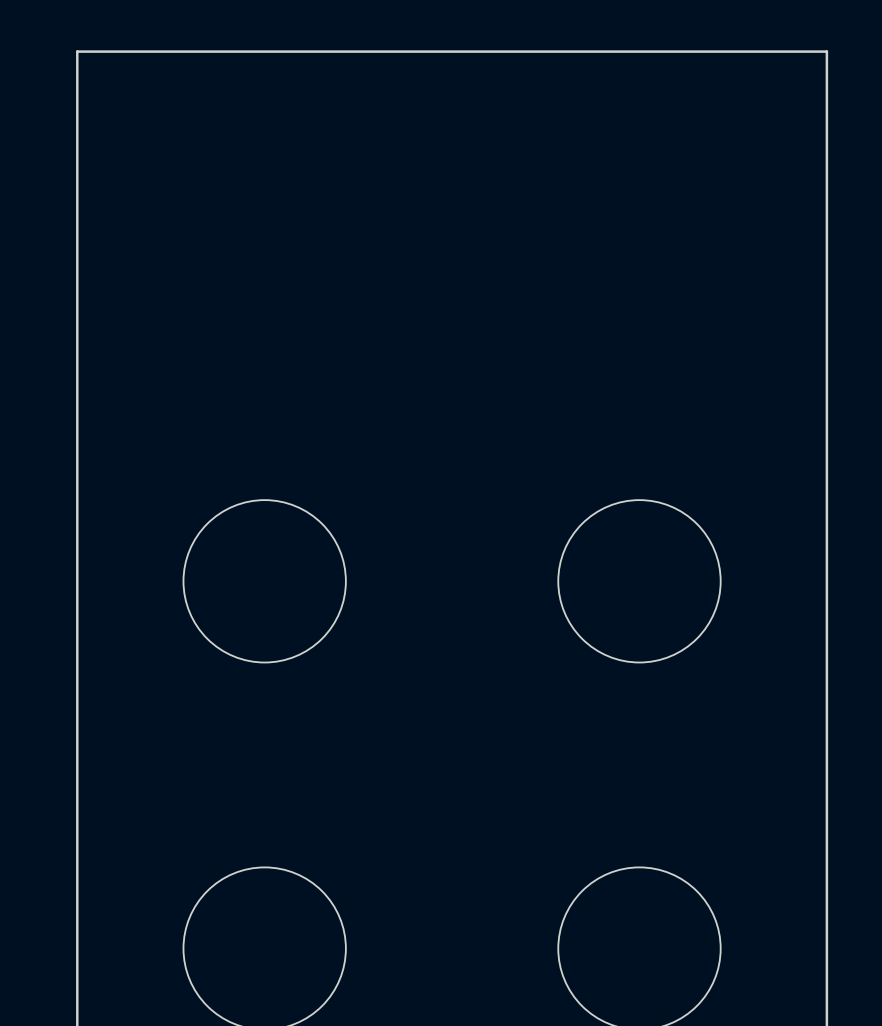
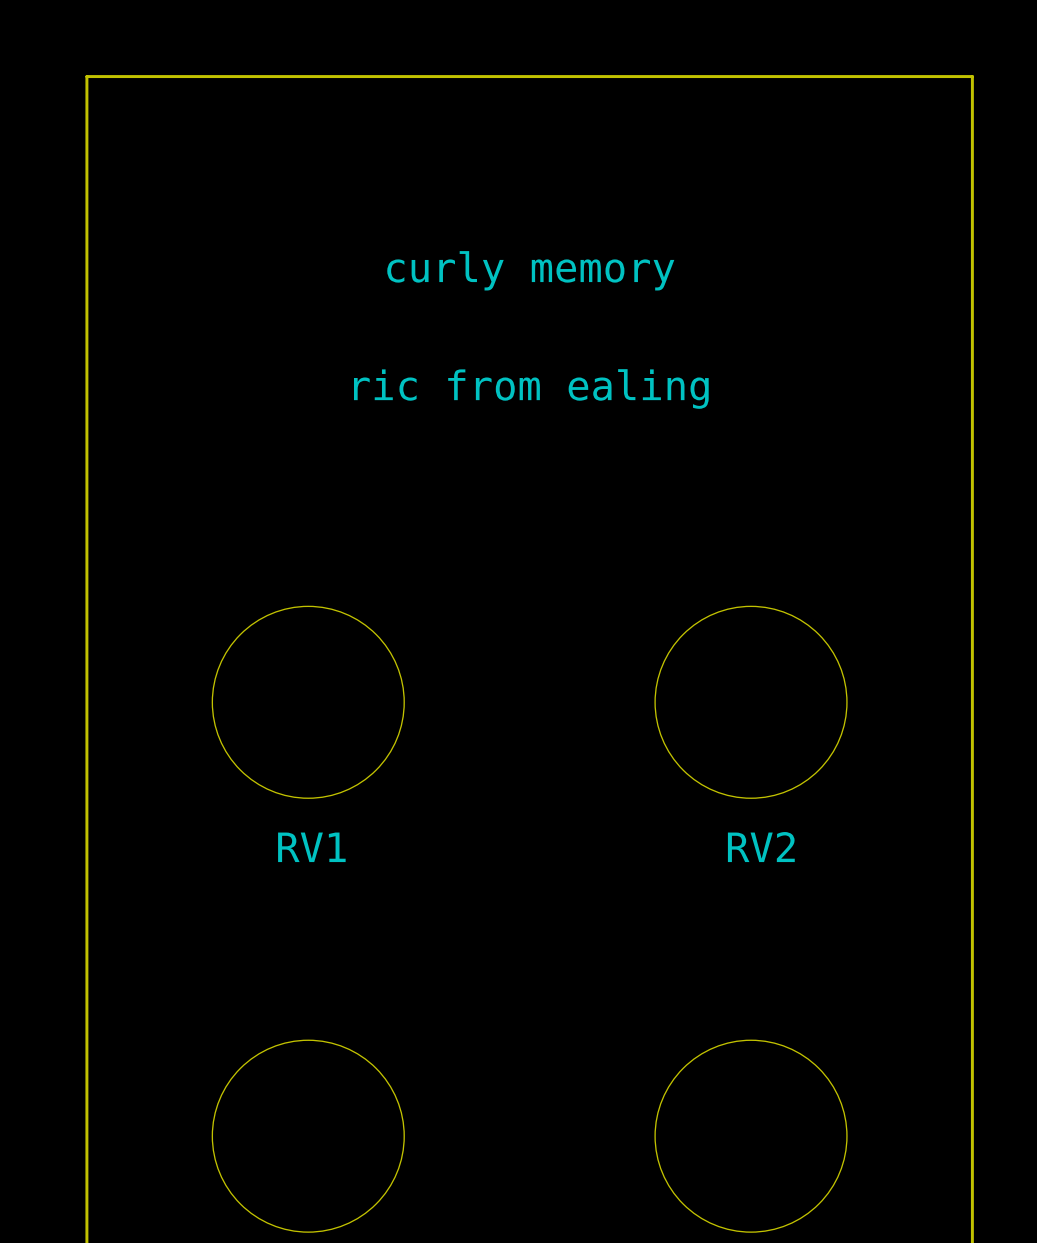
text: none -> curly memory (530, 270)
text: none -> ric from ealing (531, 388)
text: none -> RV2 (761, 847)
text: none -> RV1 (311, 847)

